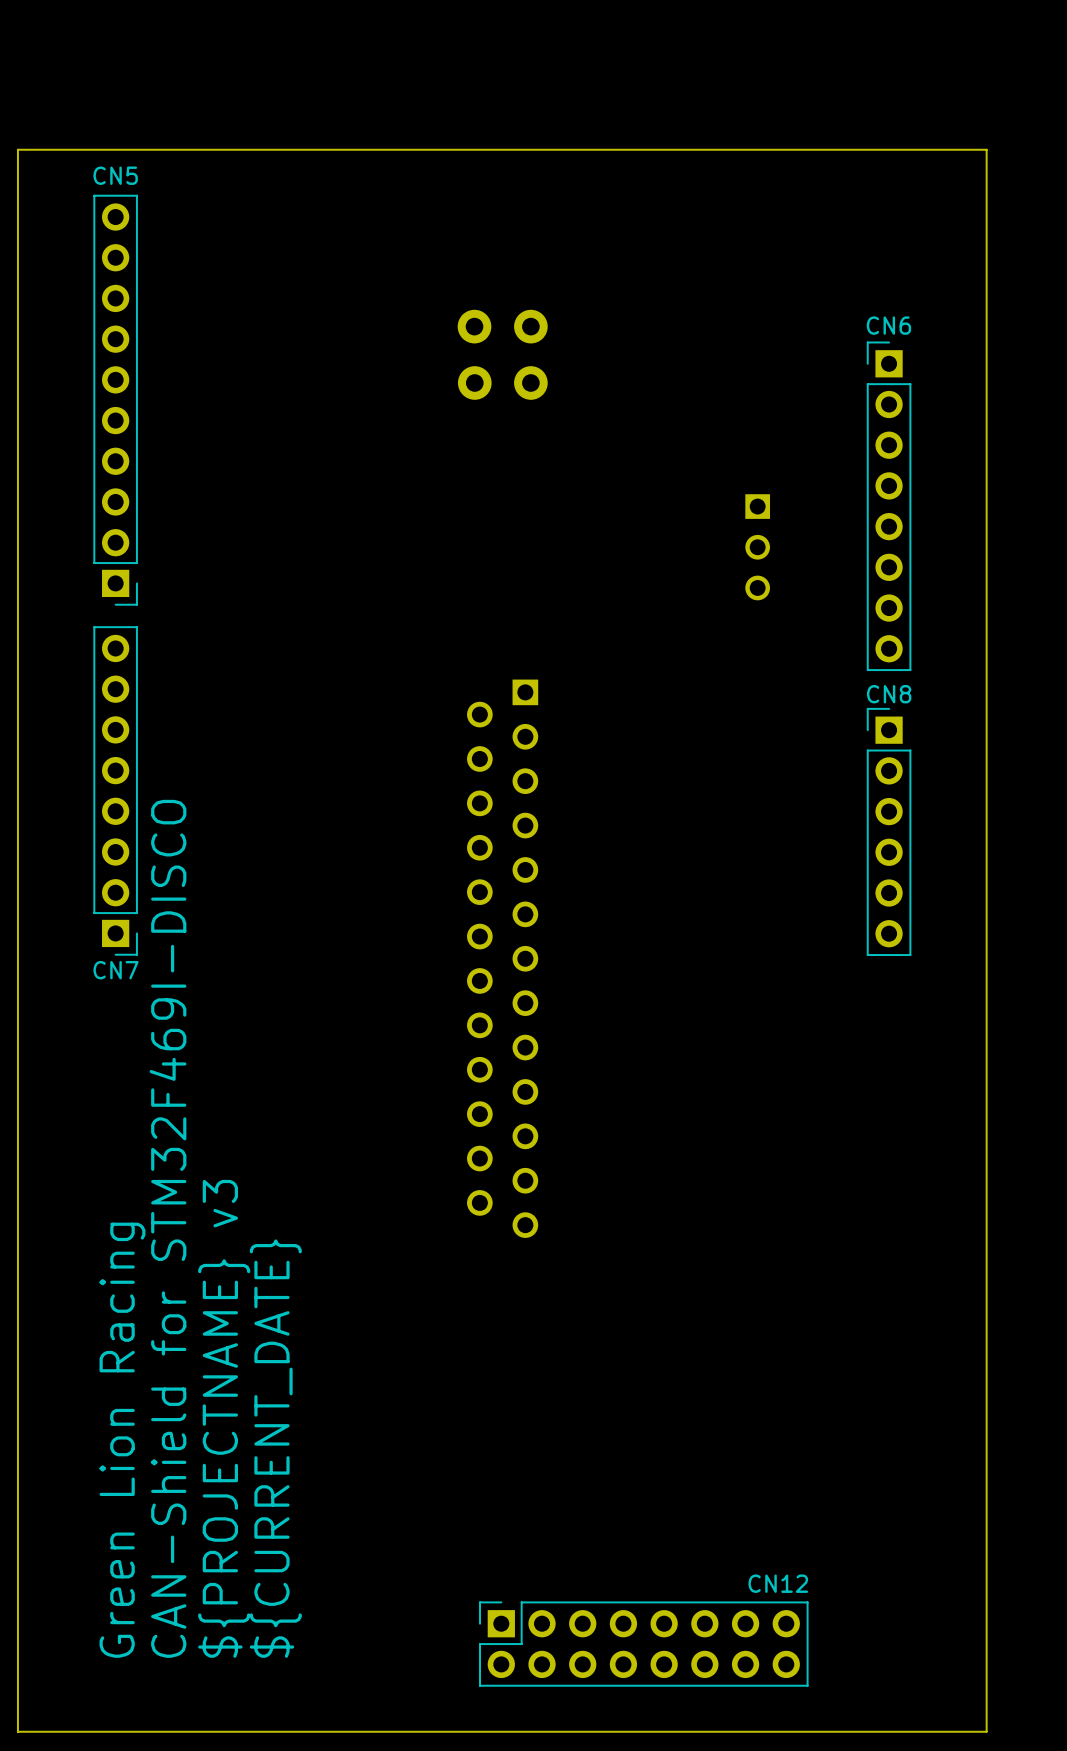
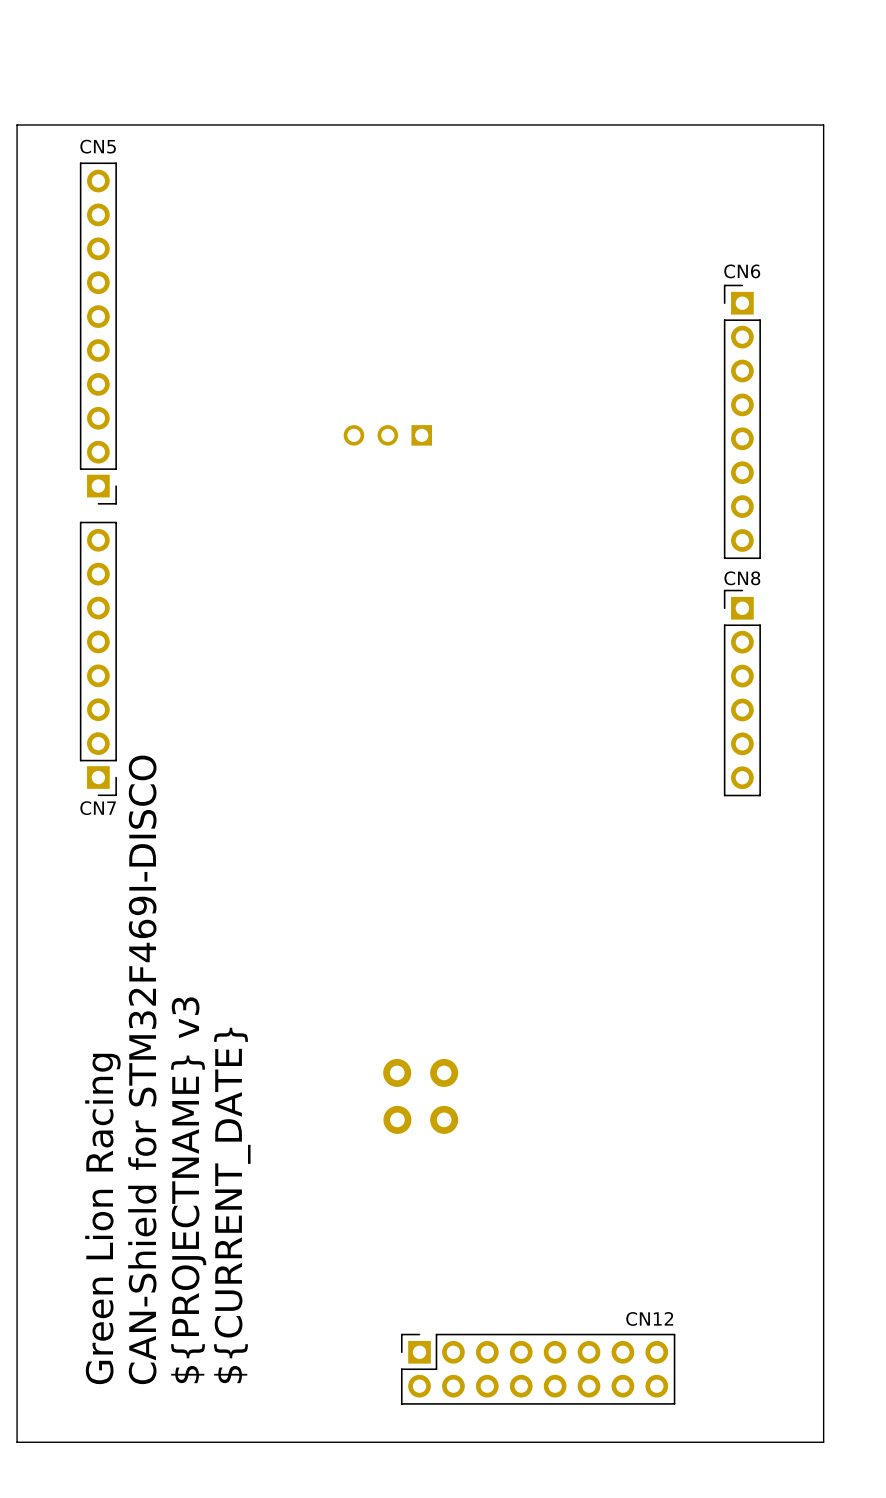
part: (502, 354) -> none
part rotation: 0° (757, 547) -> 90° clockwise (387, 435)
part position: (757, 547) -> (387, 435)
part: (502, 958) -> none
part: none -> (420, 1096)

